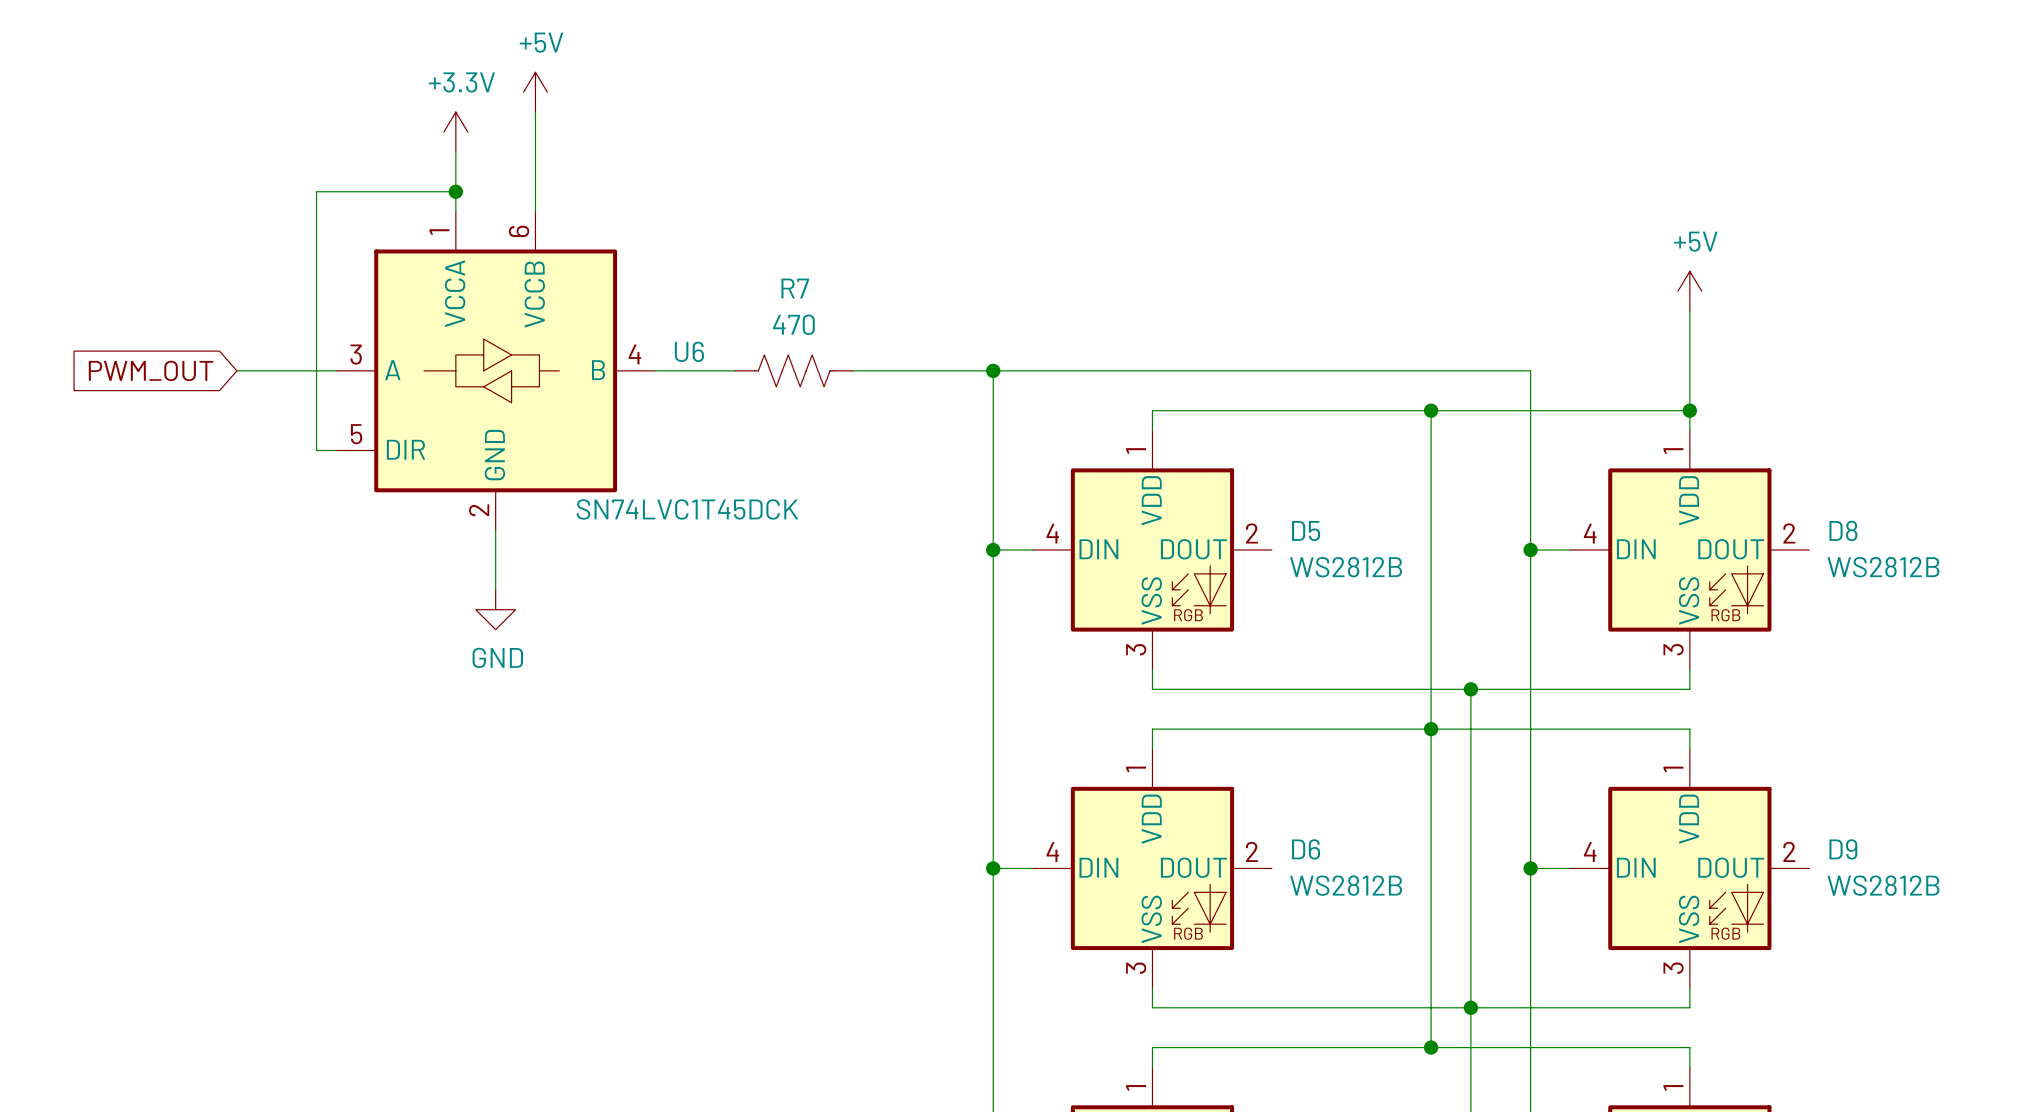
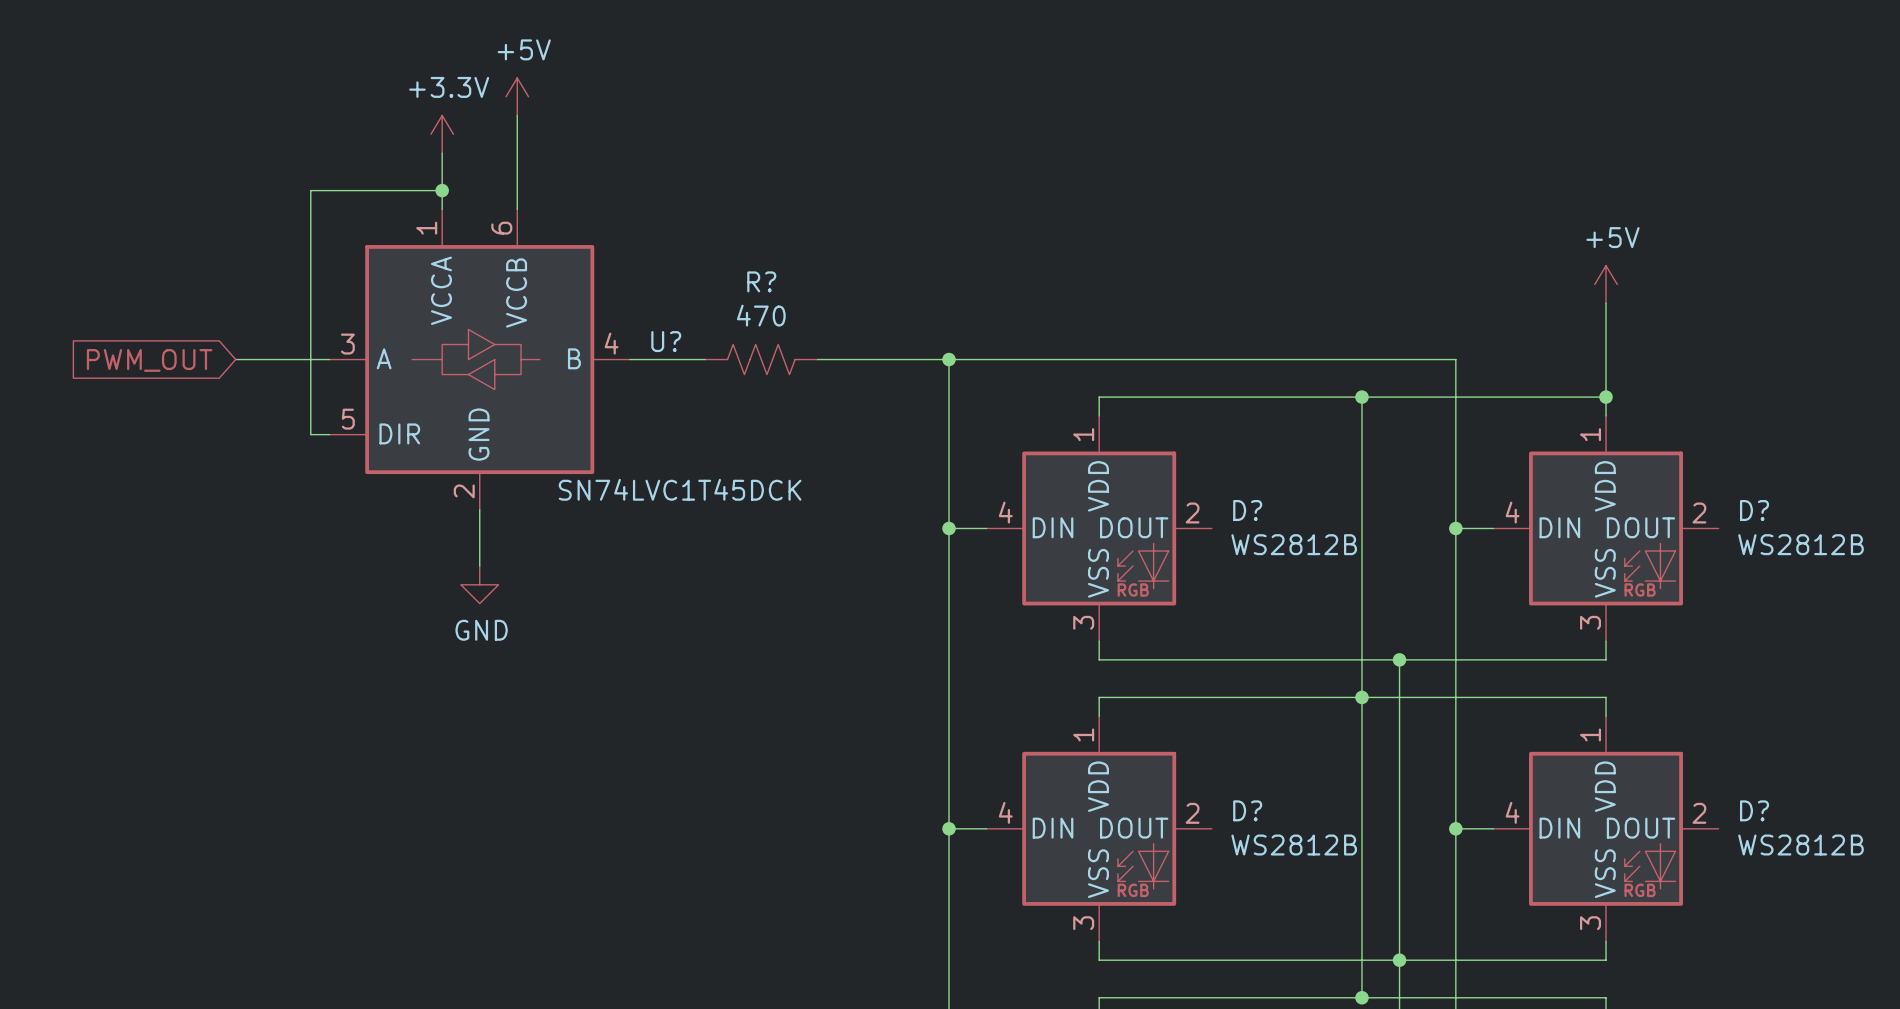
R7 name: R7 (795, 288) -> R? (761, 281)
U6 name: U6 (689, 351) -> U? (666, 341)
D8 name: D8 (1843, 530) -> D? (1754, 510)
D5 name: D5 (1306, 531) -> D? (1247, 510)
D6 name: D6 (1306, 849) -> D? (1247, 810)
D9 name: D9 (1843, 849) -> D? (1754, 810)

